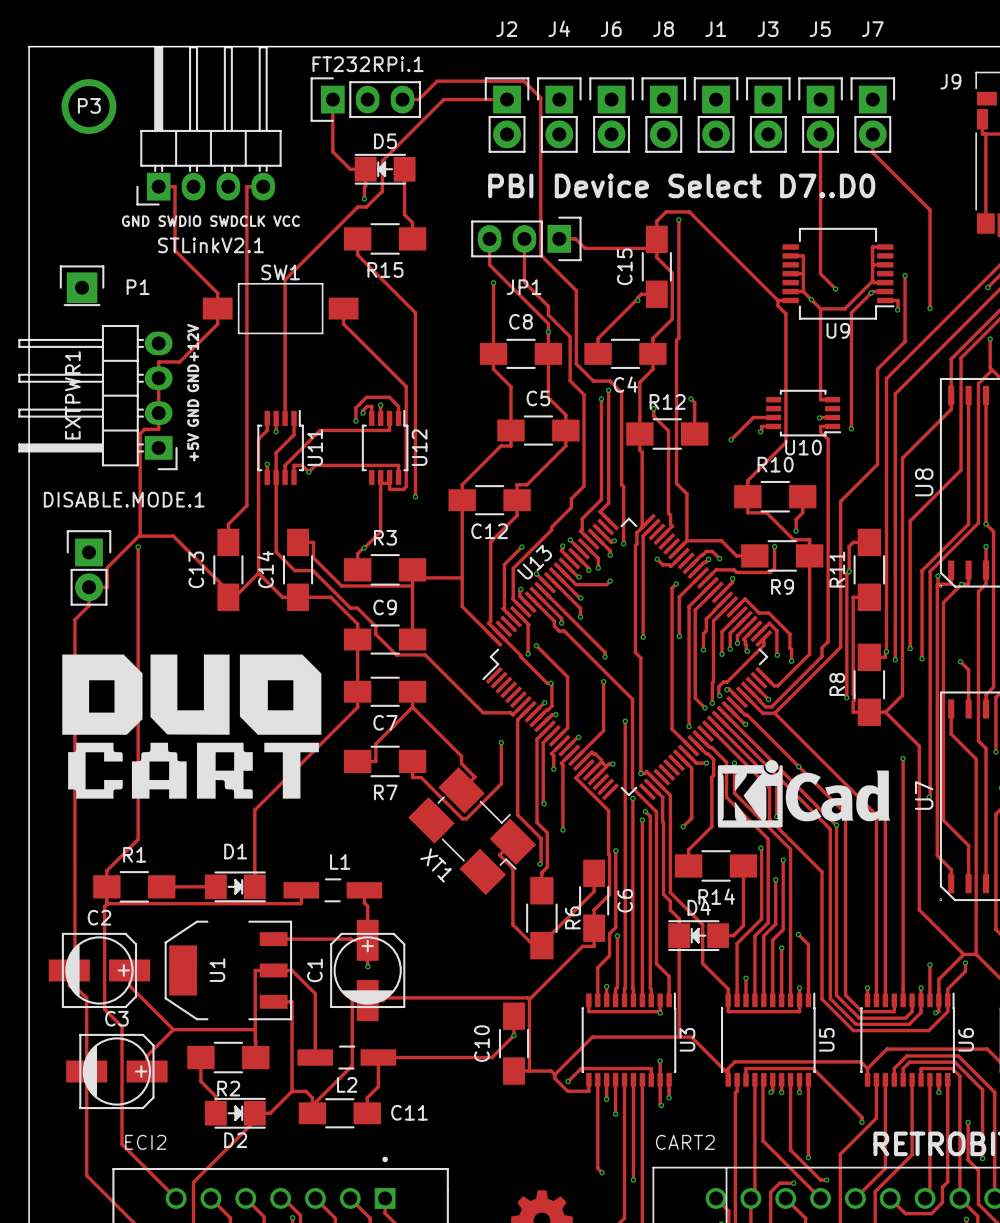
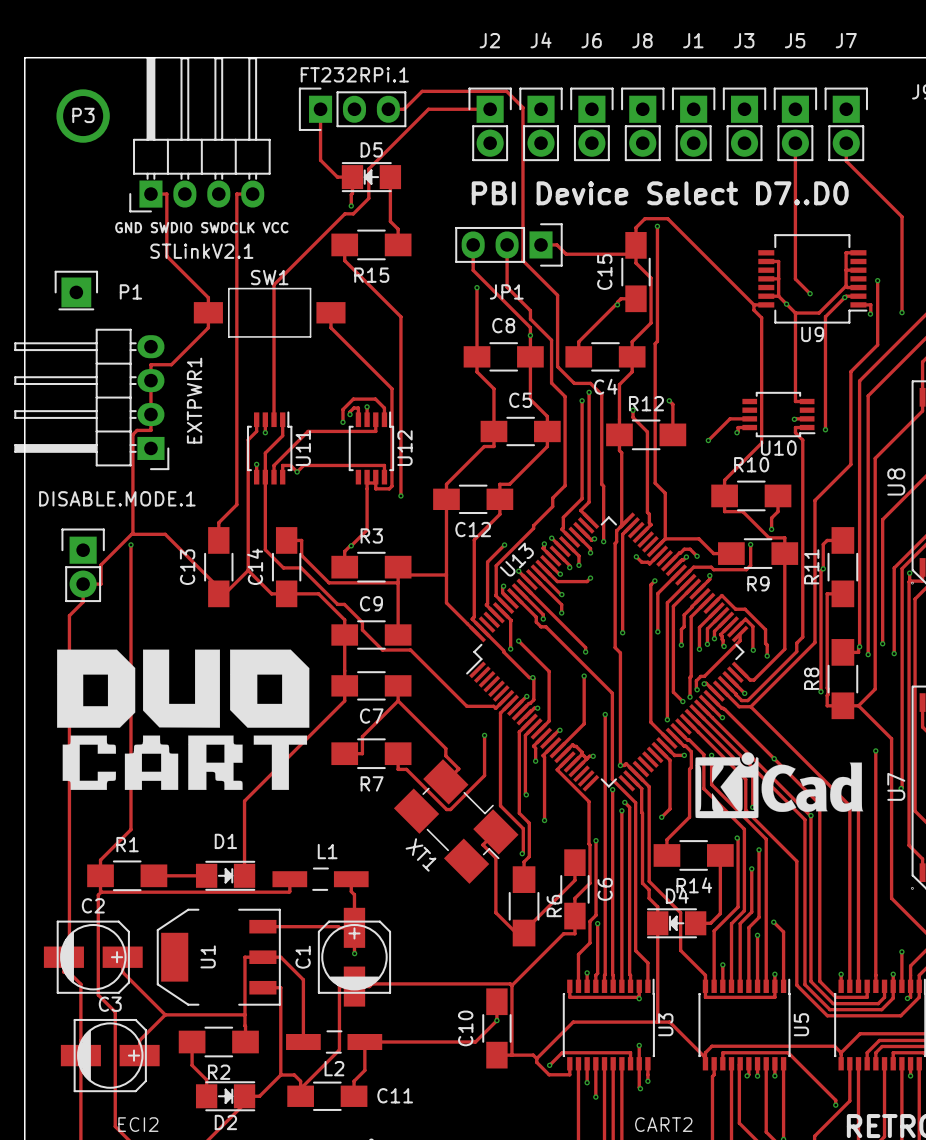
text: +12V (193, 342) -> none
text: GND (193, 378) -> none
EXTPWR1 name position: EXTPWR1 (72, 395) -> EXTPWR1 (194, 400)
text: GND (193, 413) -> none
text: +5V (193, 447) -> none

